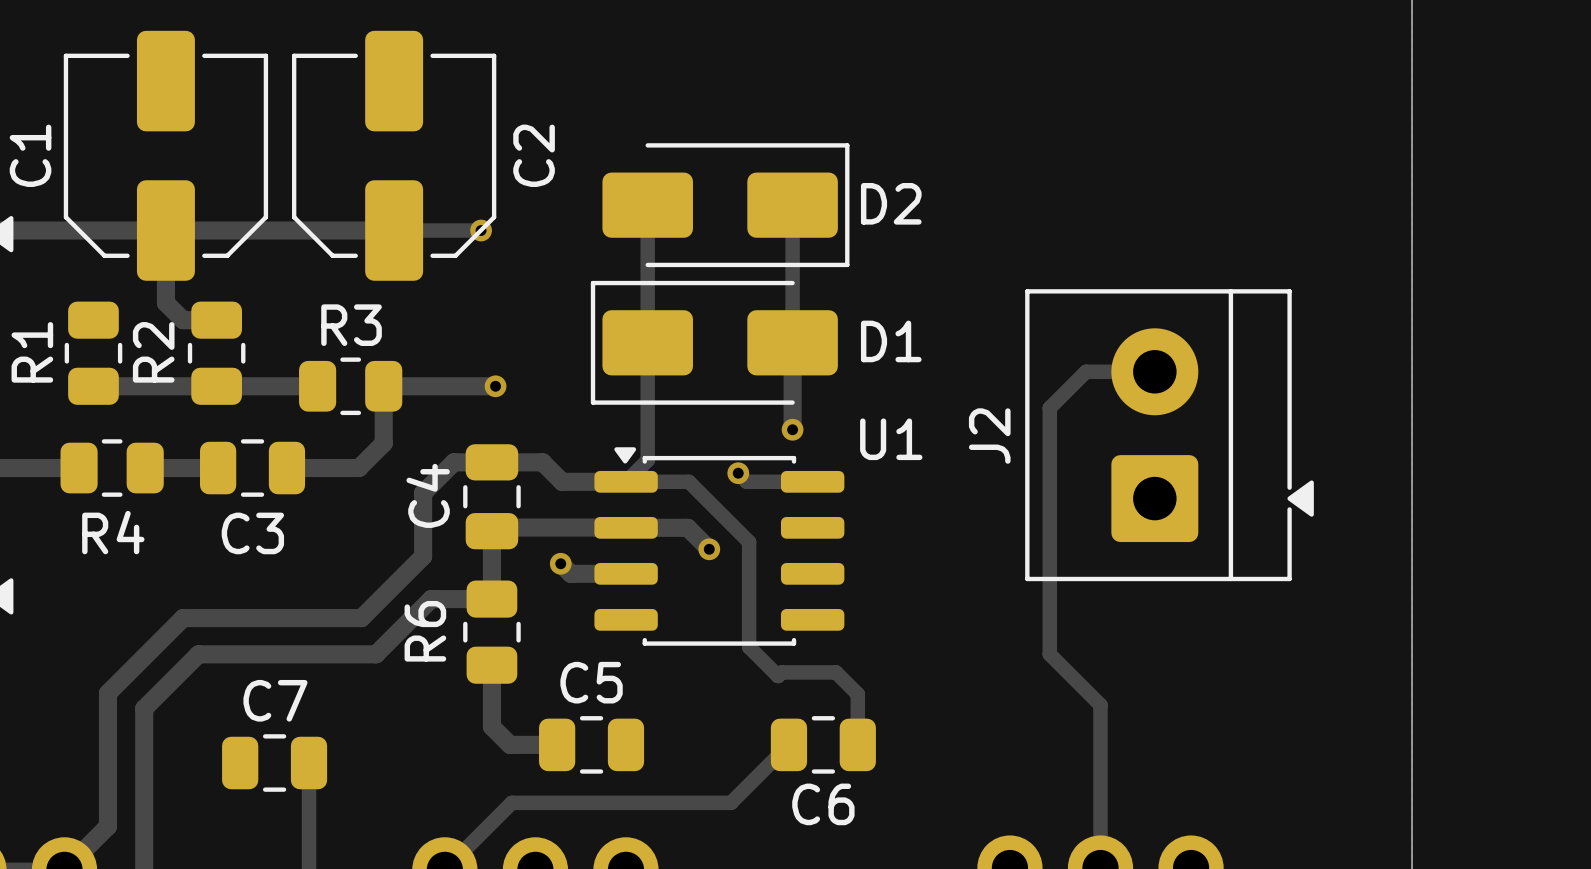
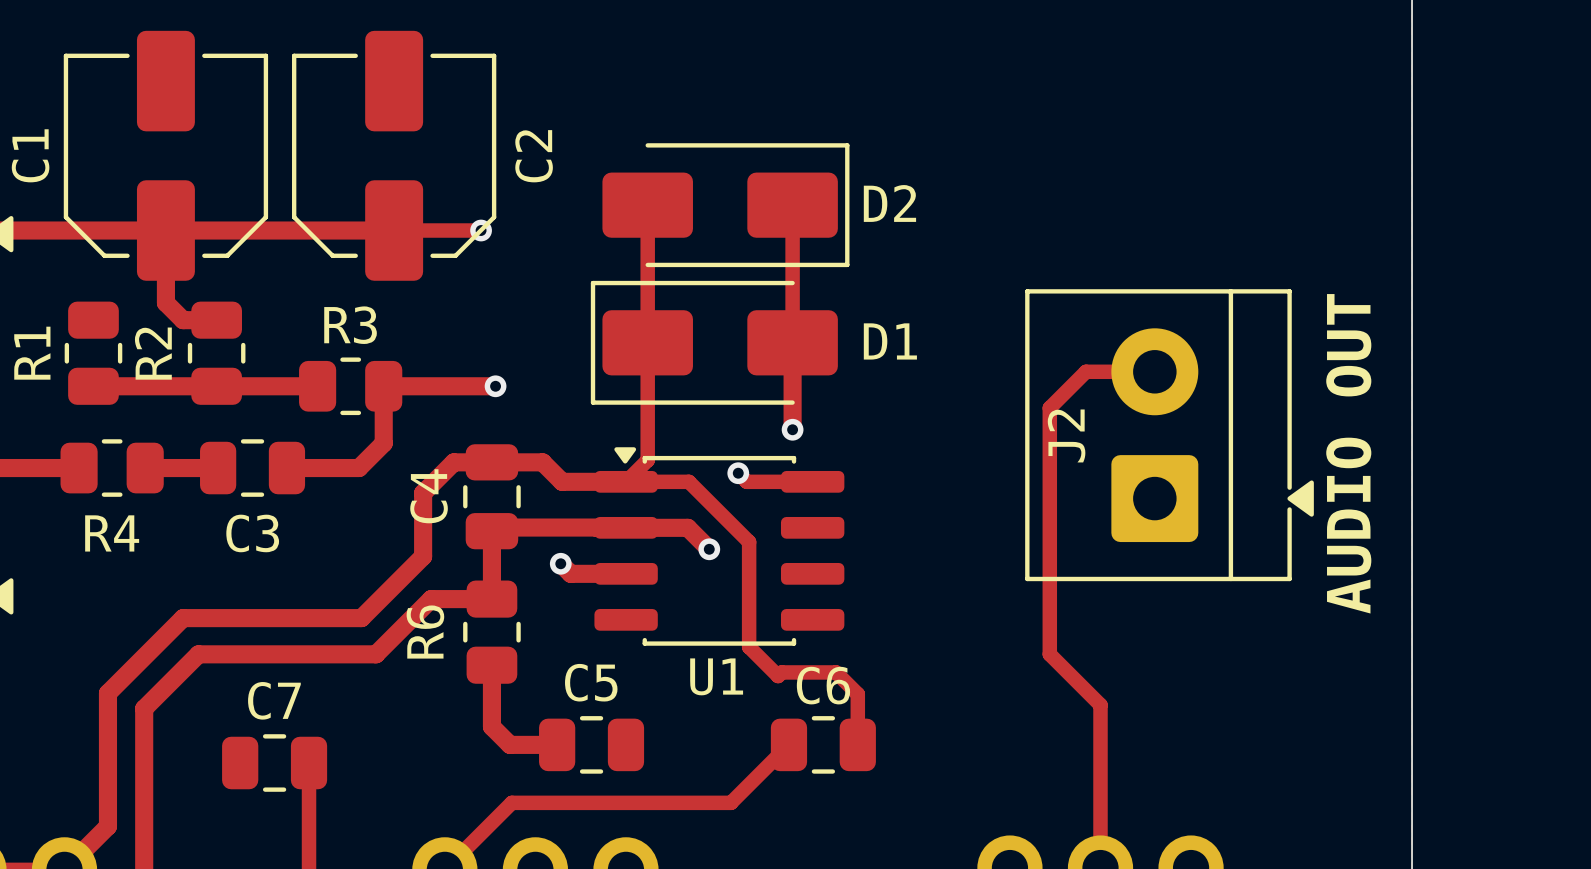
text: none -> AUDIO OUT (1348, 453)
J2 name position: J2 (989, 436) -> J2 (1066, 435)
U1 name position: U1 (891, 439) -> U1 (716, 676)
C6 name position: C6 (823, 804) -> C6 (823, 685)

